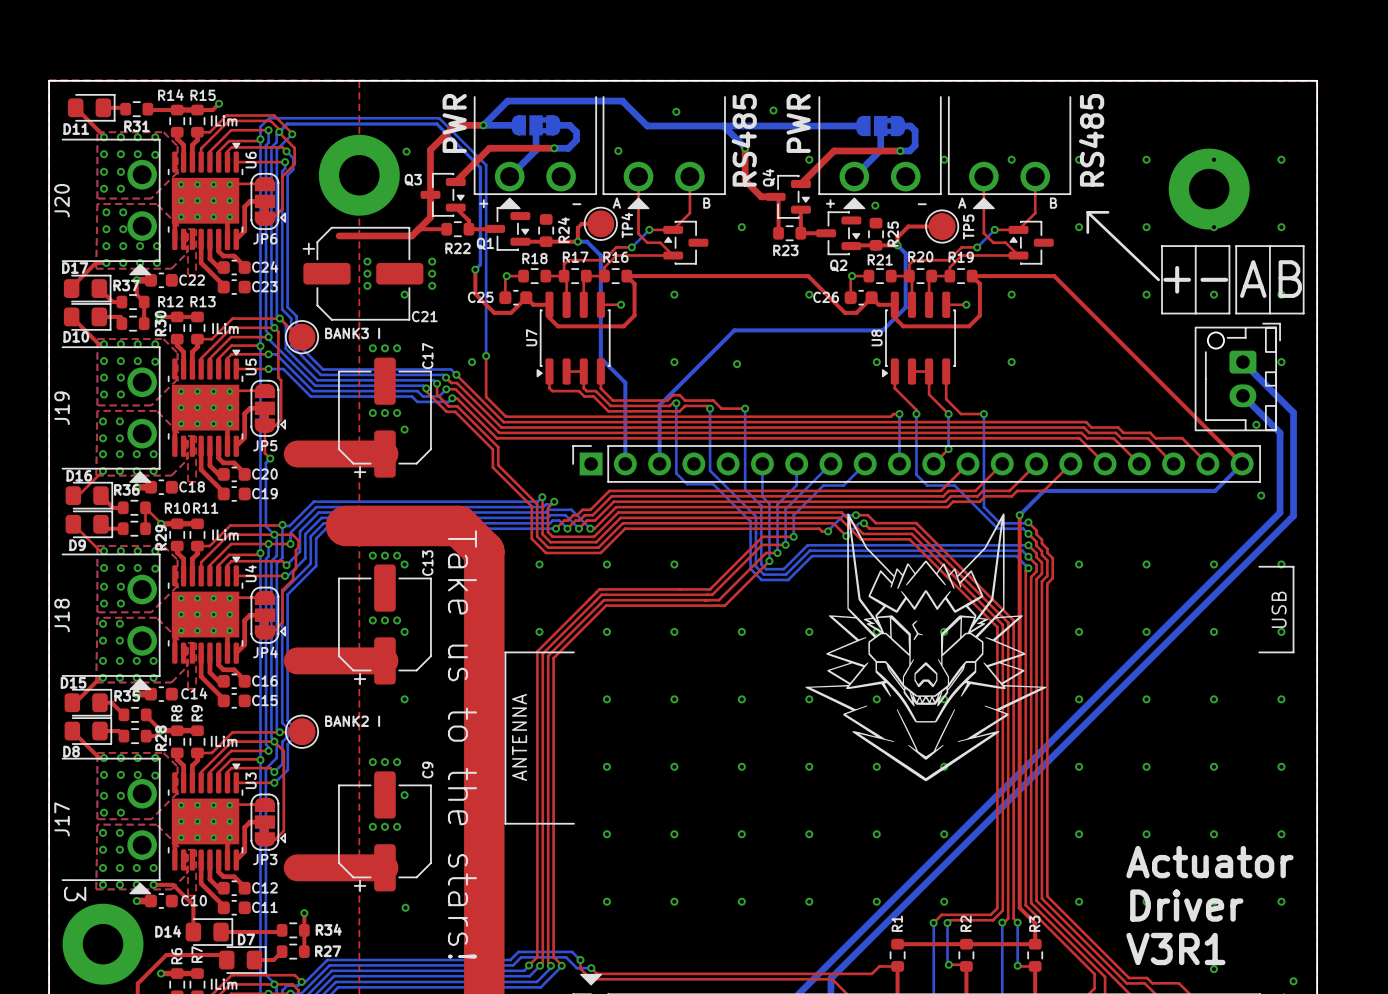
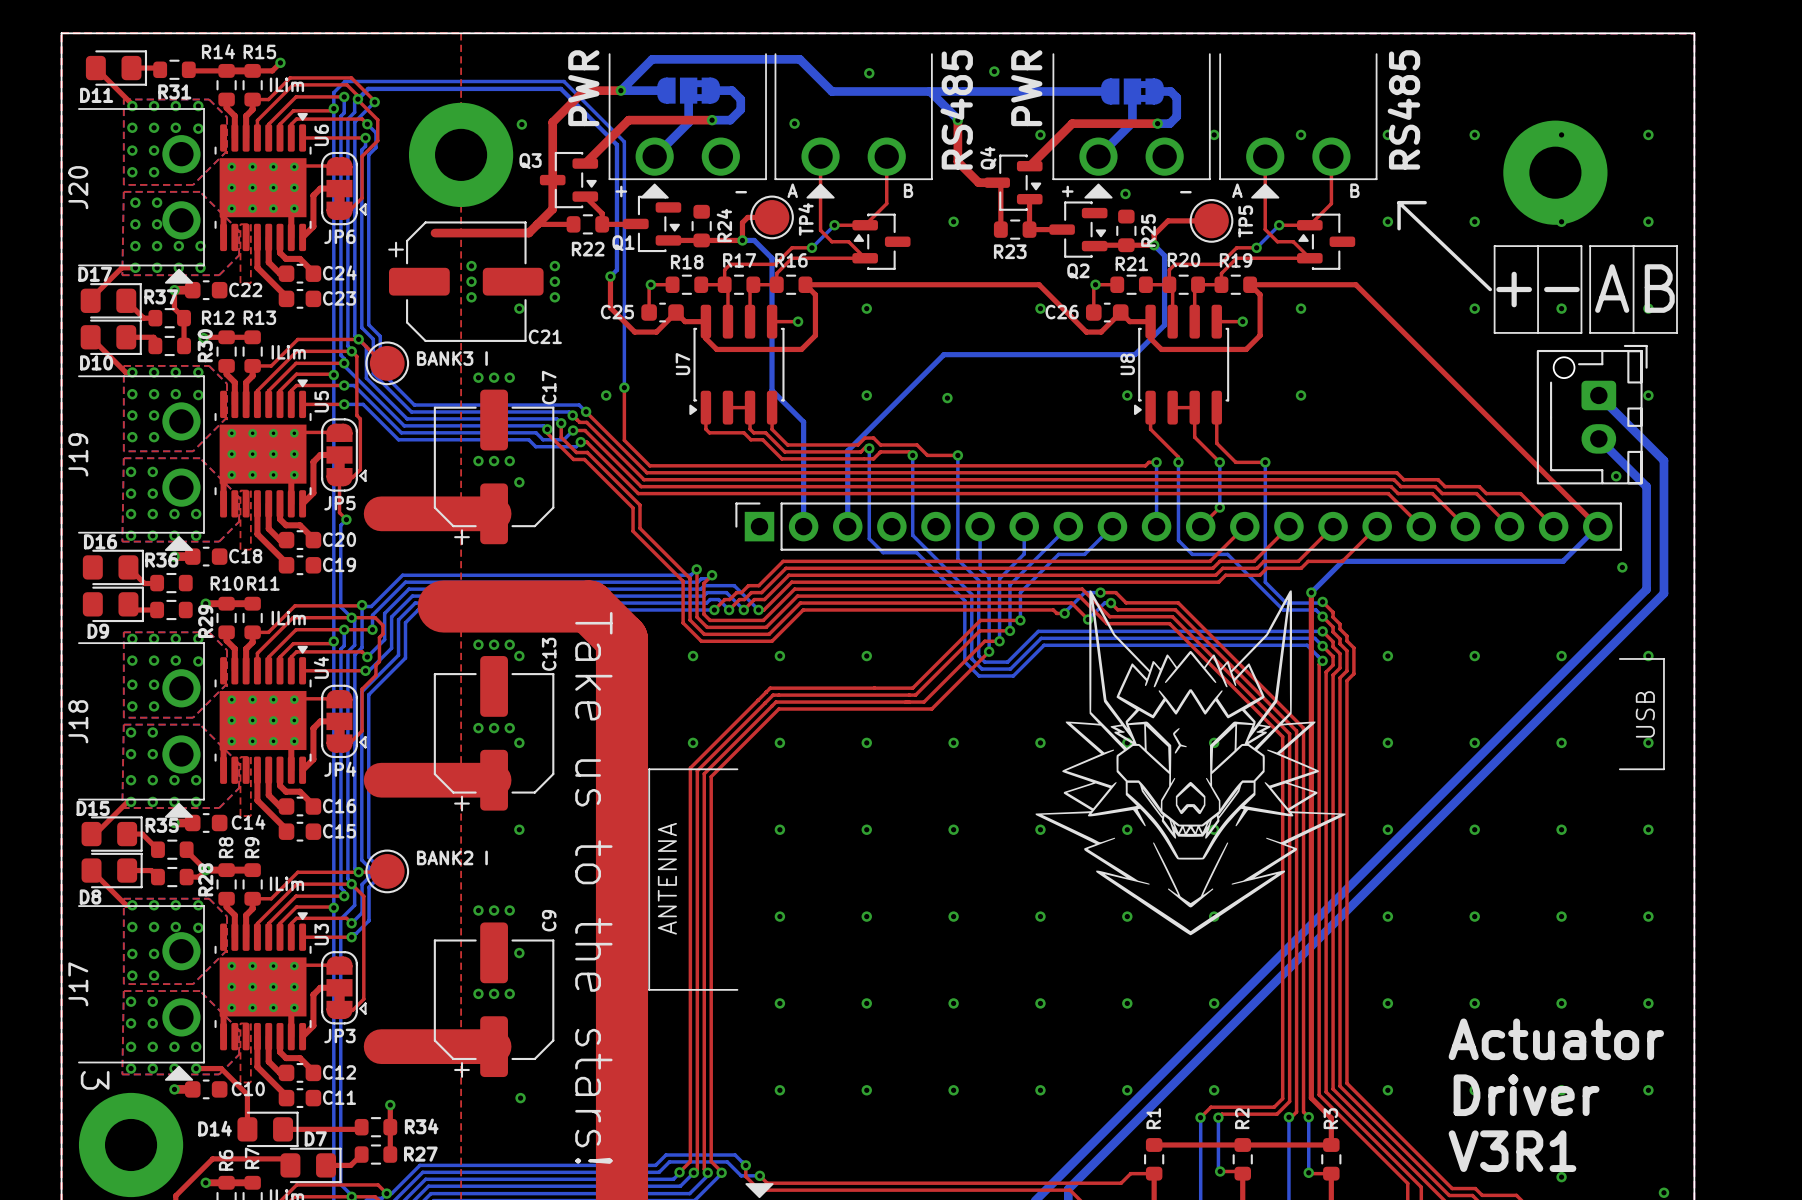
top track: (103, 471) (78, 495) (73, 495) -> none
top track: (161, 523) (145, 507) (145, 528) -> none
top track: (73, 524) (100, 551) (104, 551) -> none

